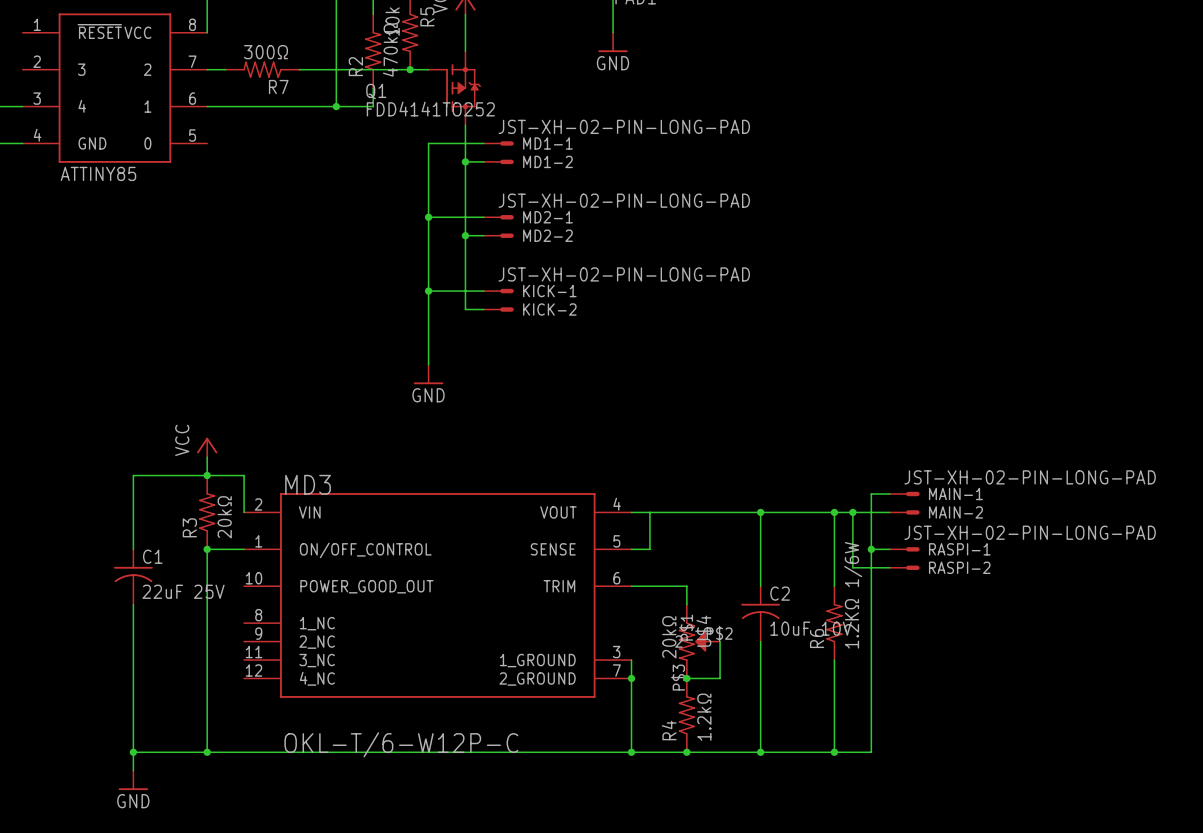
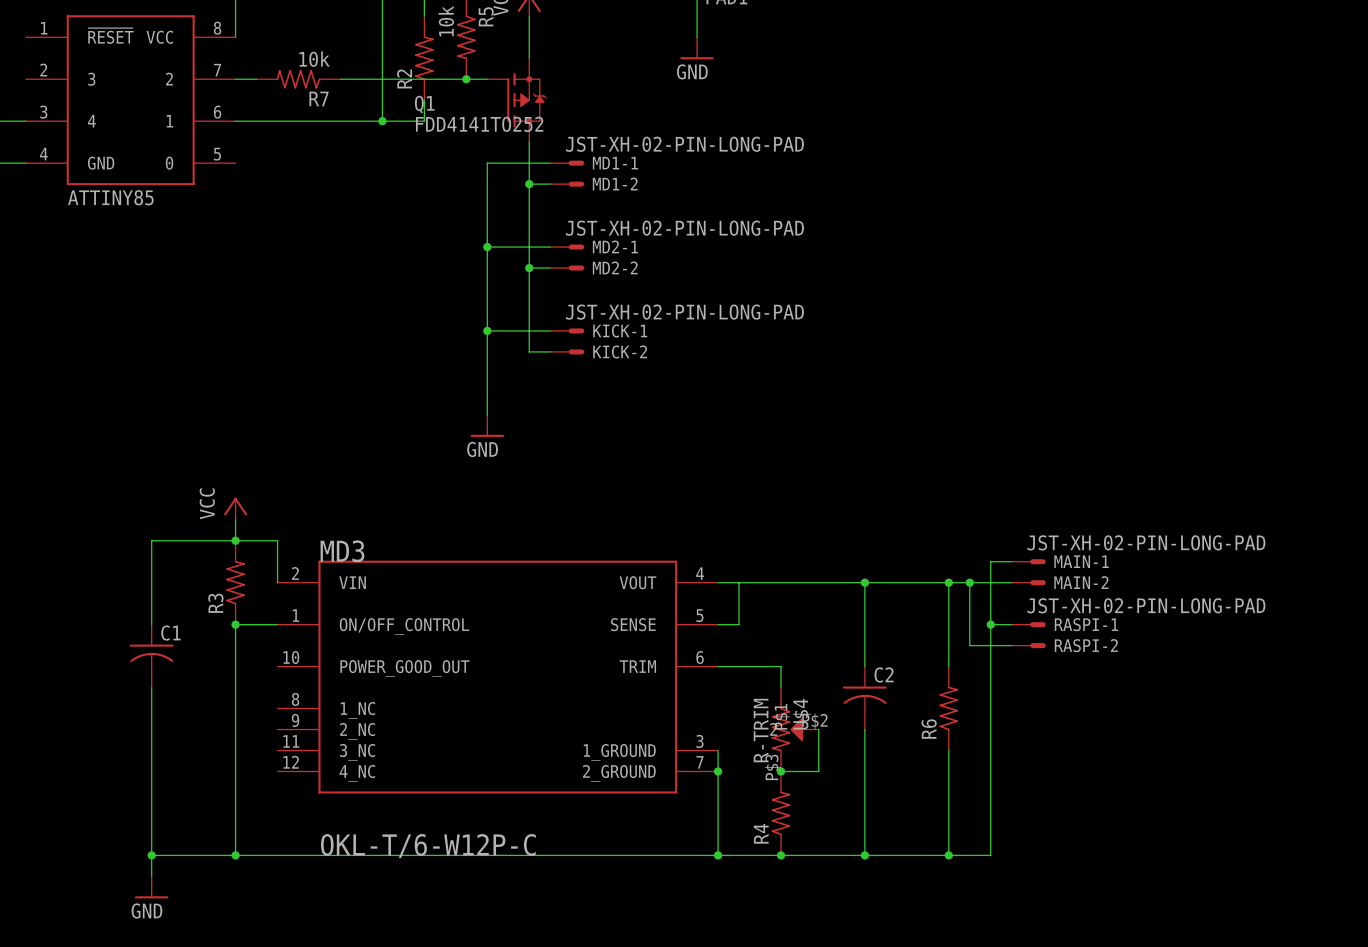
R2 value: 470kΩ (390, 50) -> none
R7 value: 300Ω (266, 52) -> 10k (314, 59)
R3 value: 20kΩ (224, 517) -> none
C1 value: 22uF 25V (183, 591) -> none
R6 value: 1.2KΩ 1/6W (853, 595) -> none
C2 value: 10uF 10V (811, 628) -> none
U$4 value: 20kΩ (669, 637) -> R-TRIM (761, 730)
R4 value: 1.2kΩ (704, 717) -> none

